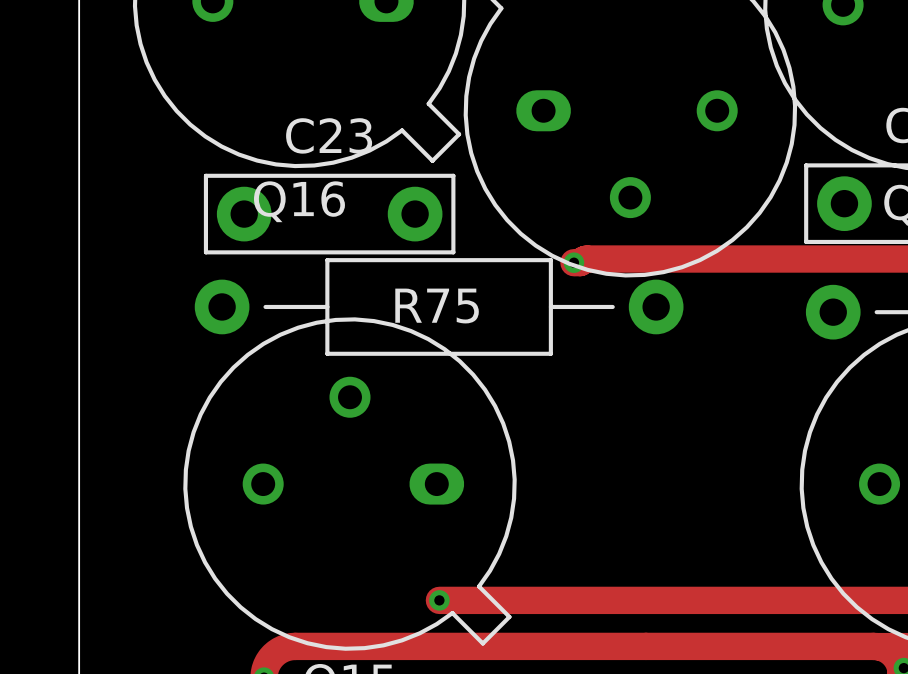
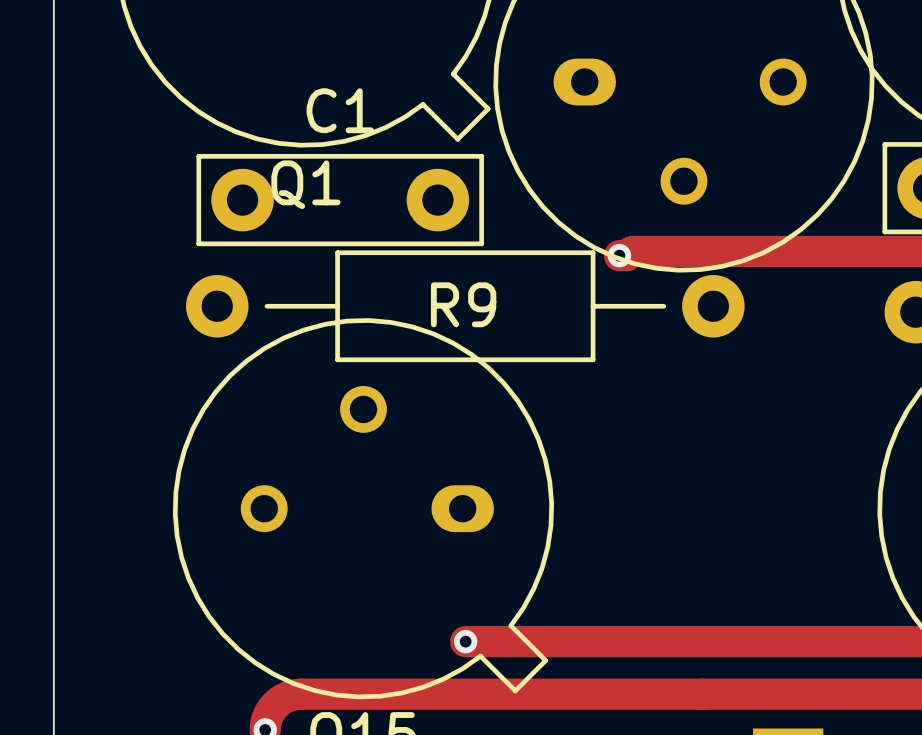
C23 name: C23 (329, 135) -> C1 (340, 110)
Q16 name: Q16 (299, 201) -> Q1 (305, 184)
R75 name: R75 (437, 306) -> R9 (463, 304)

